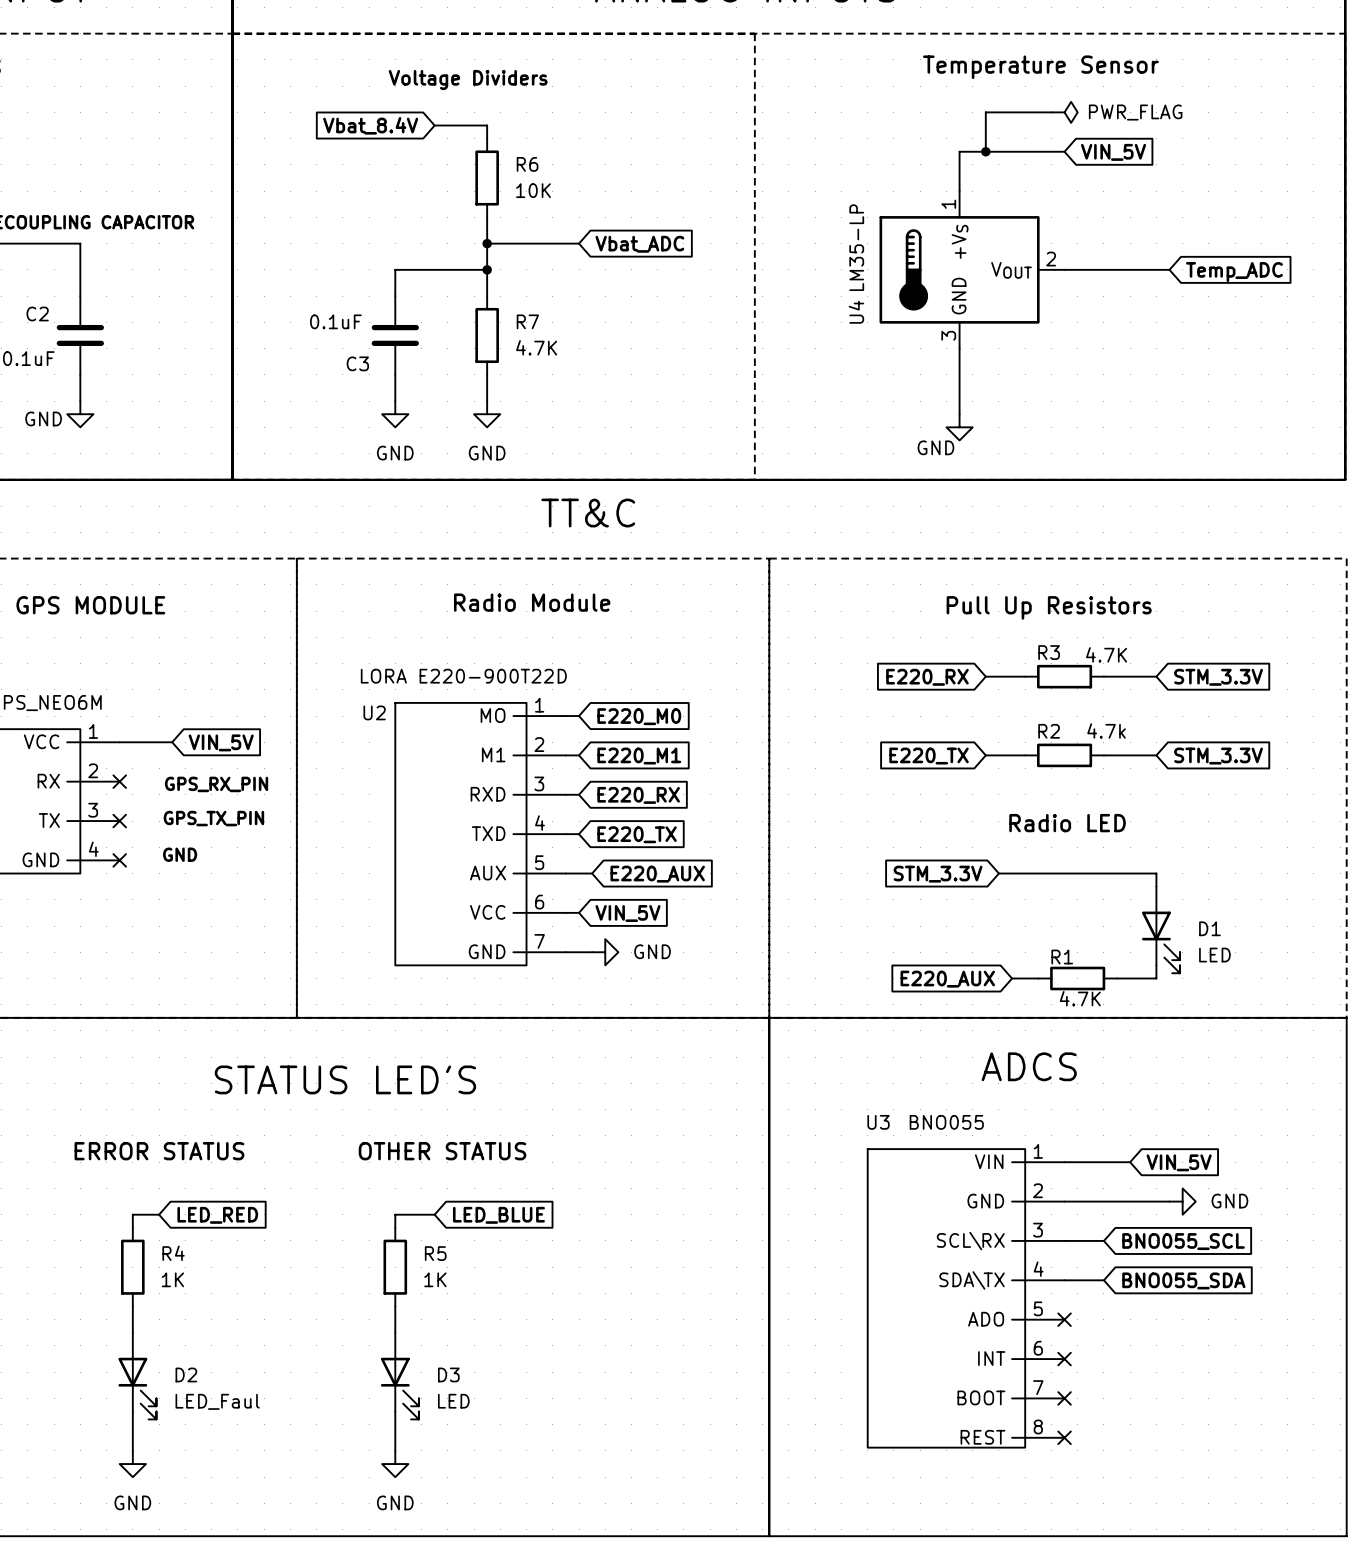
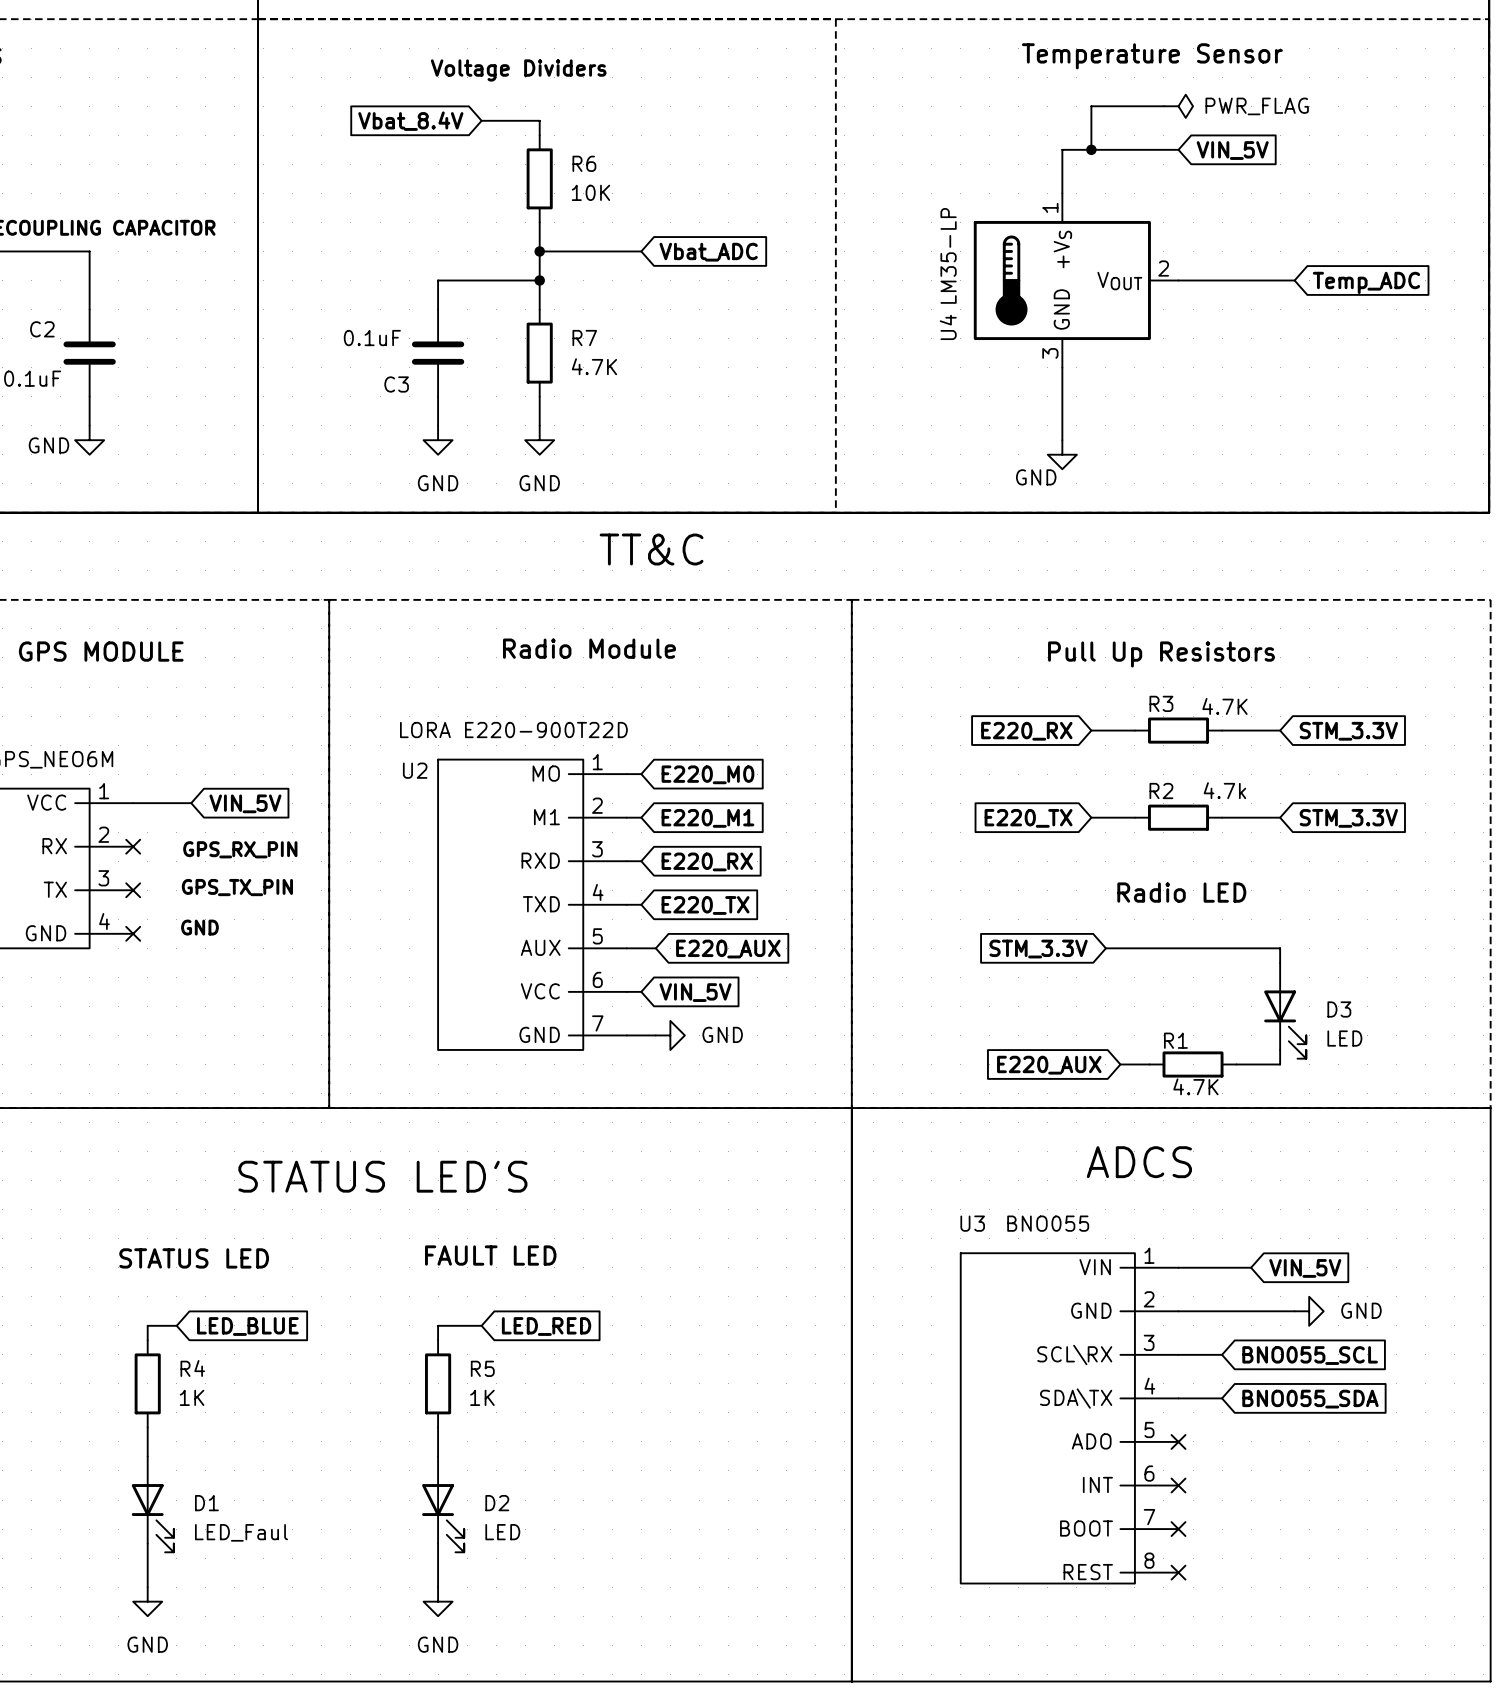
D1 name: D1 (1209, 928) -> D3 (1339, 1009)
text: ERROR STATUS (159, 1151) -> none
text: OTHER STATUS (442, 1151) -> FAULT LED (490, 1255)
text: none -> STATUS LED (194, 1258)
global label: LED_RED (217, 1215) -> LED_BLUE (247, 1326)
global label: LED_BLUE (498, 1215) -> LED_RED (546, 1326)
D2 name: D2 (186, 1374) -> D1 (206, 1503)
D3 name: D3 (448, 1374) -> D2 (497, 1503)

